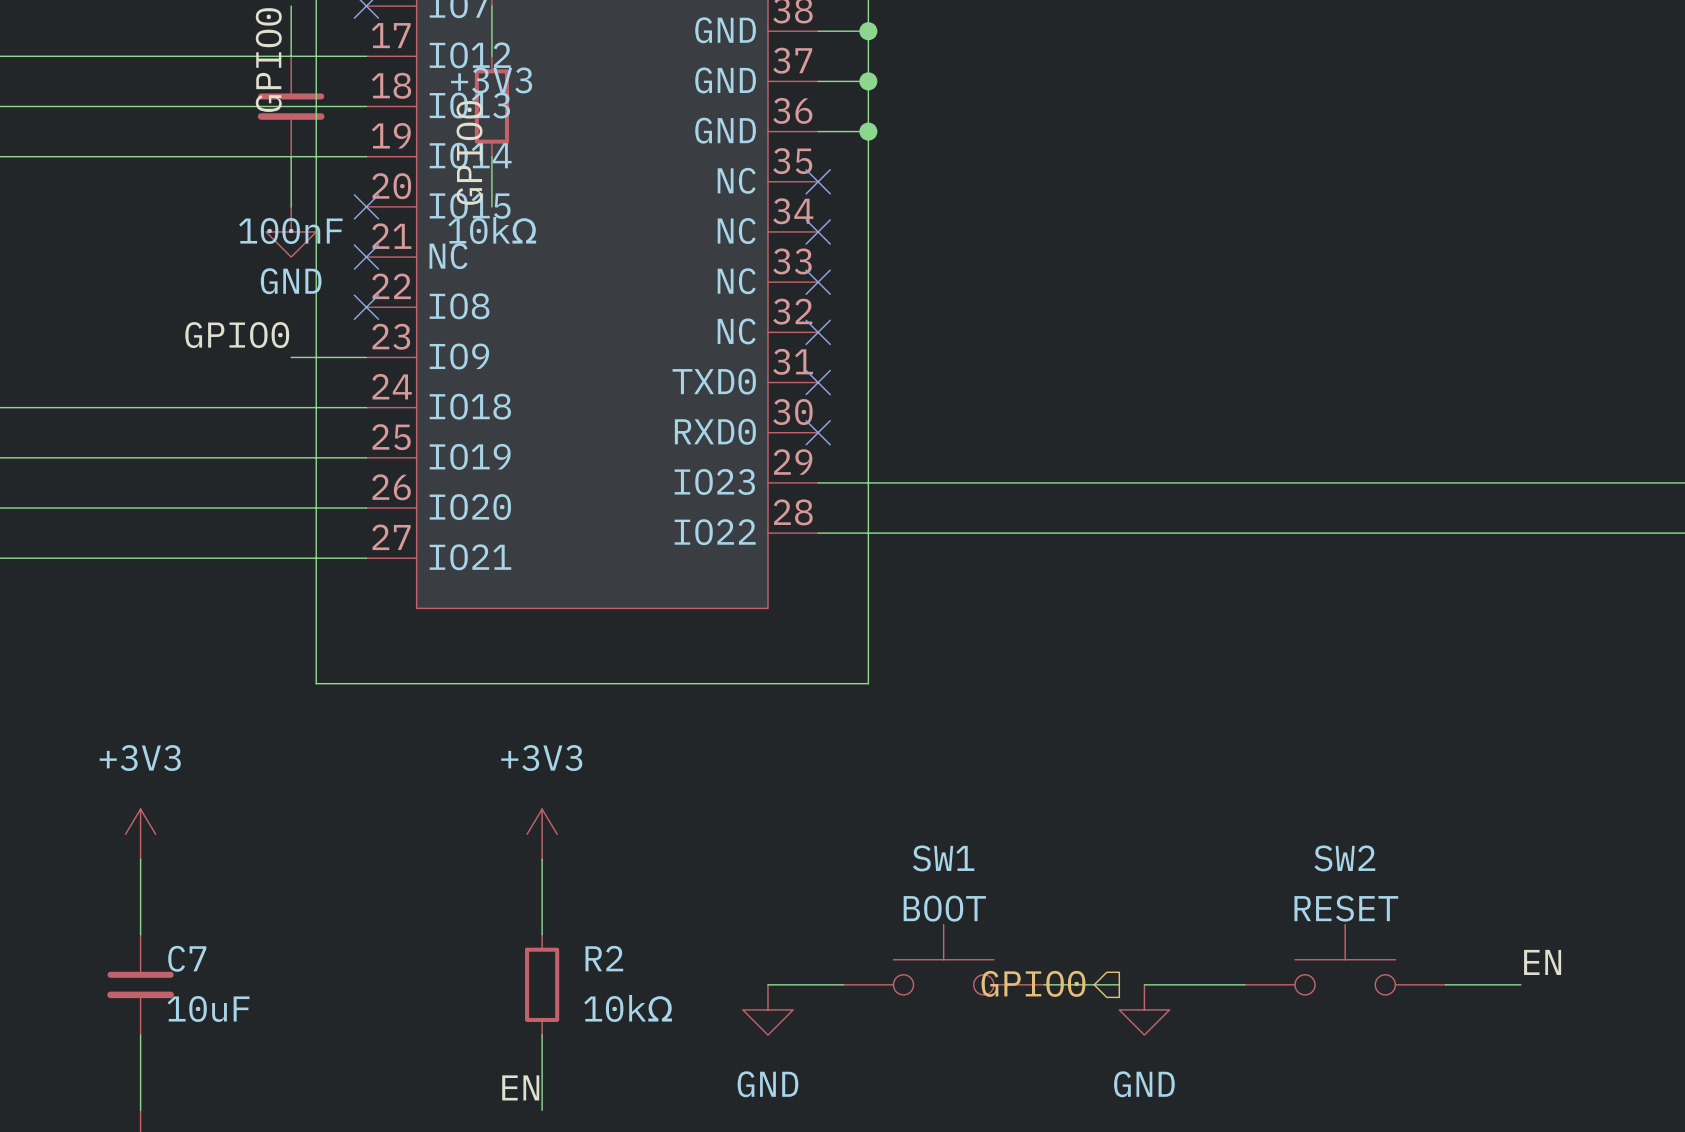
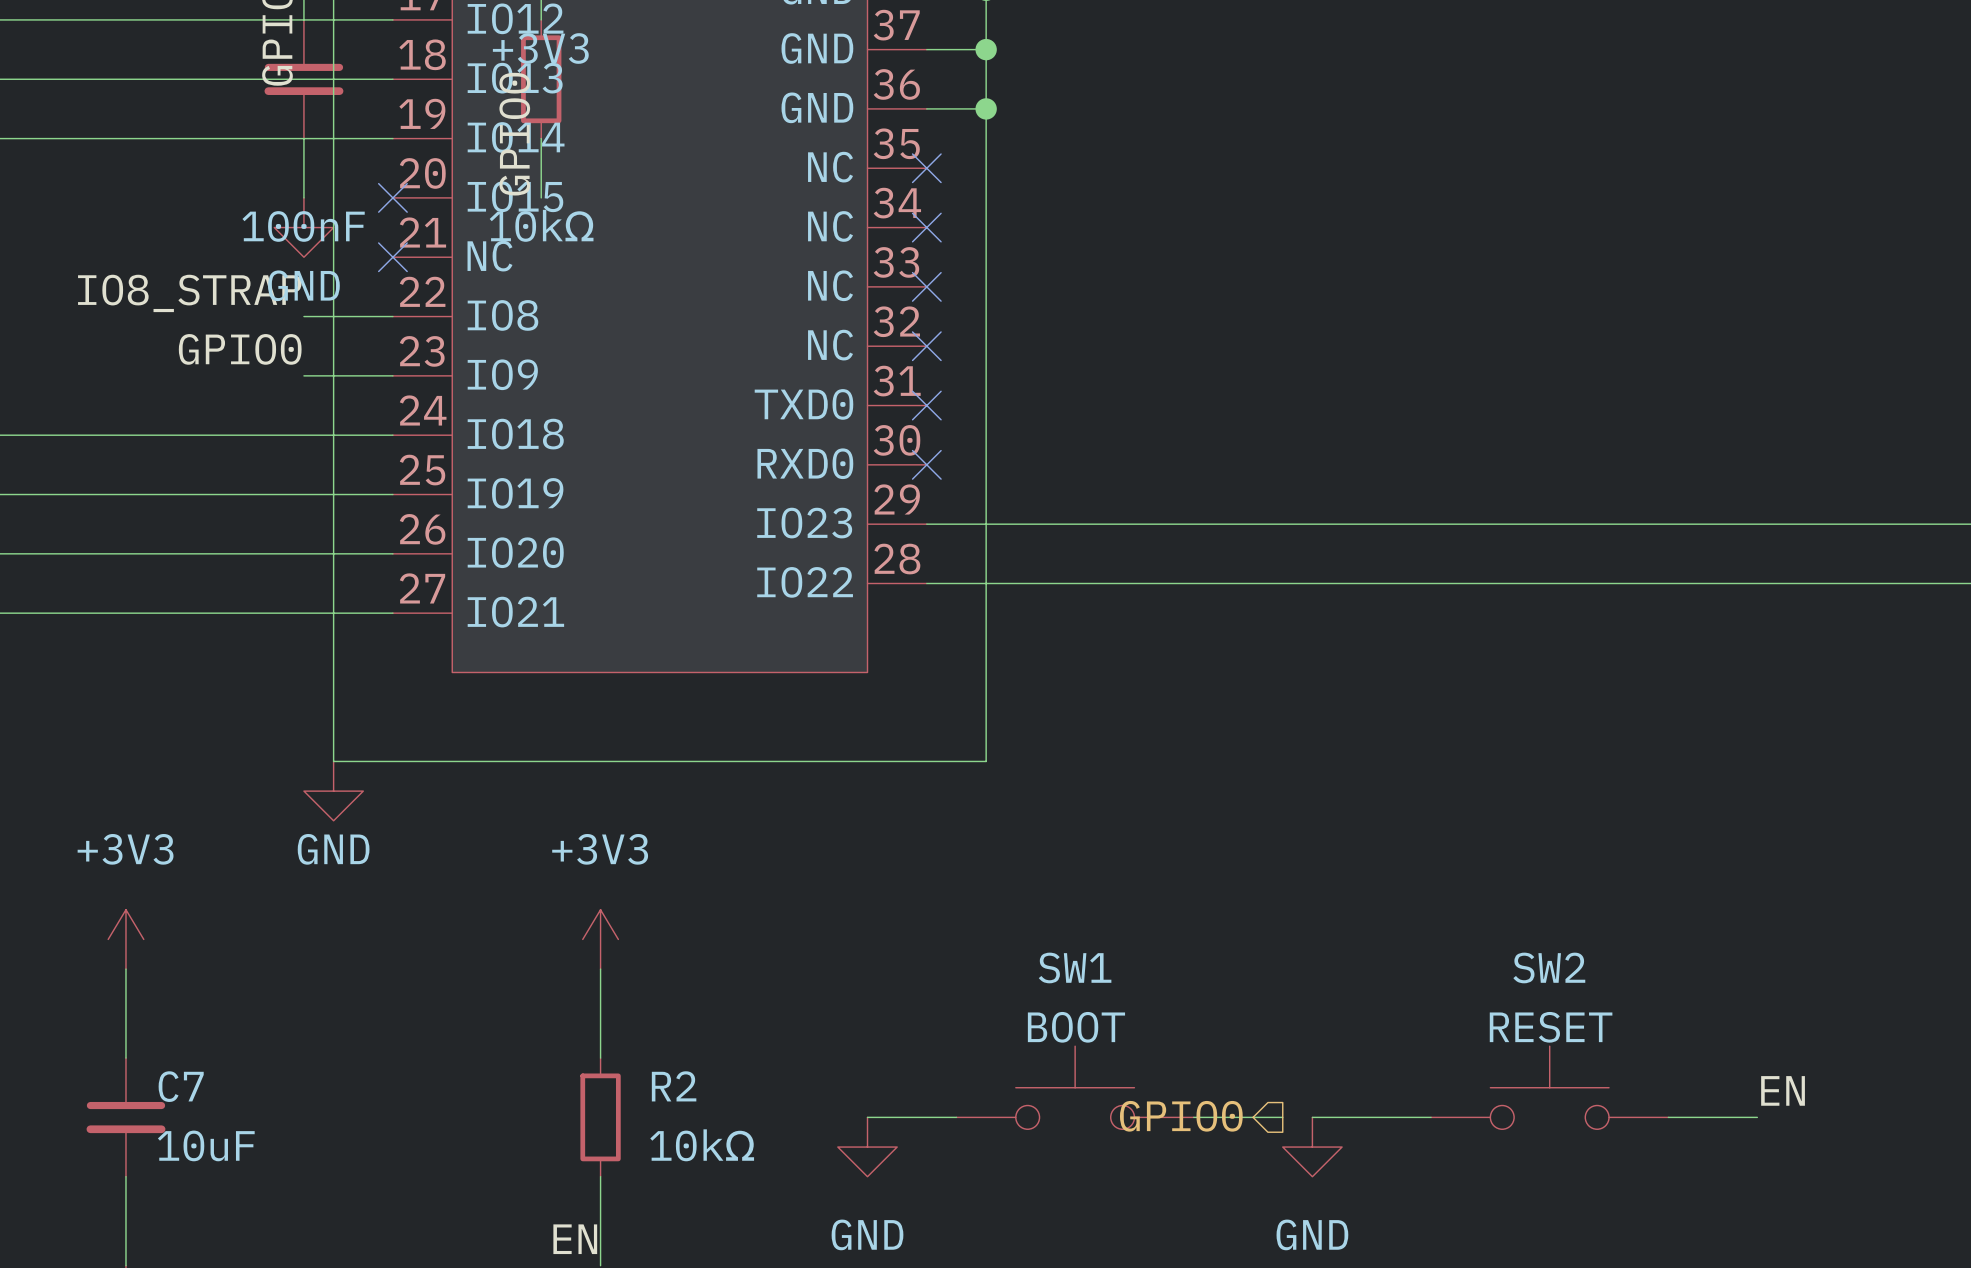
label: none -> IO8_STRAP (189, 293)
wire: none -> (303, 316) (392, 316)
no-connect mark: (366, 307) -> none
power symbol: none -> GND (333, 791)

